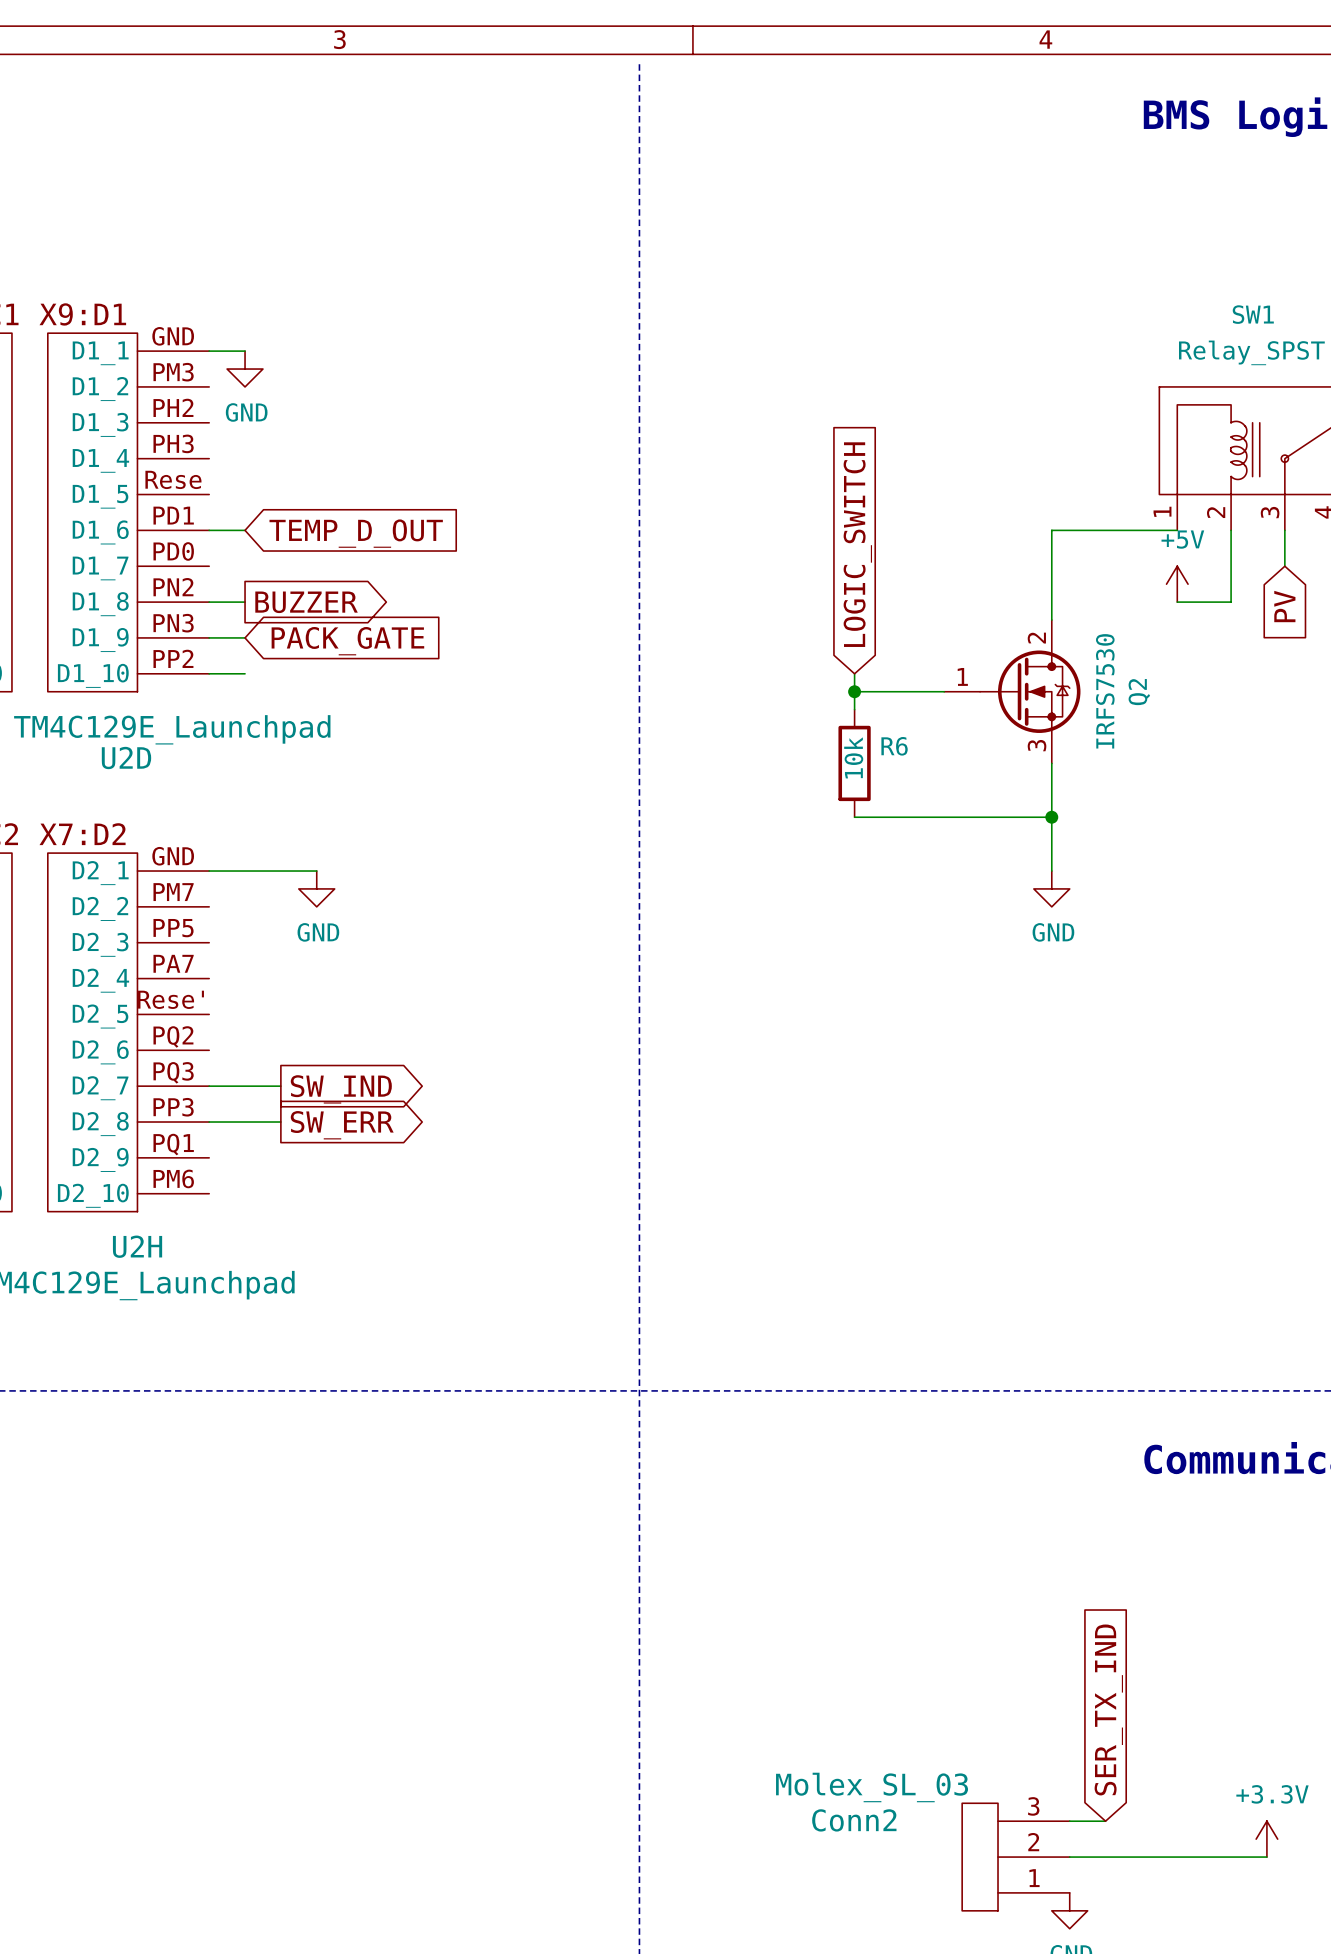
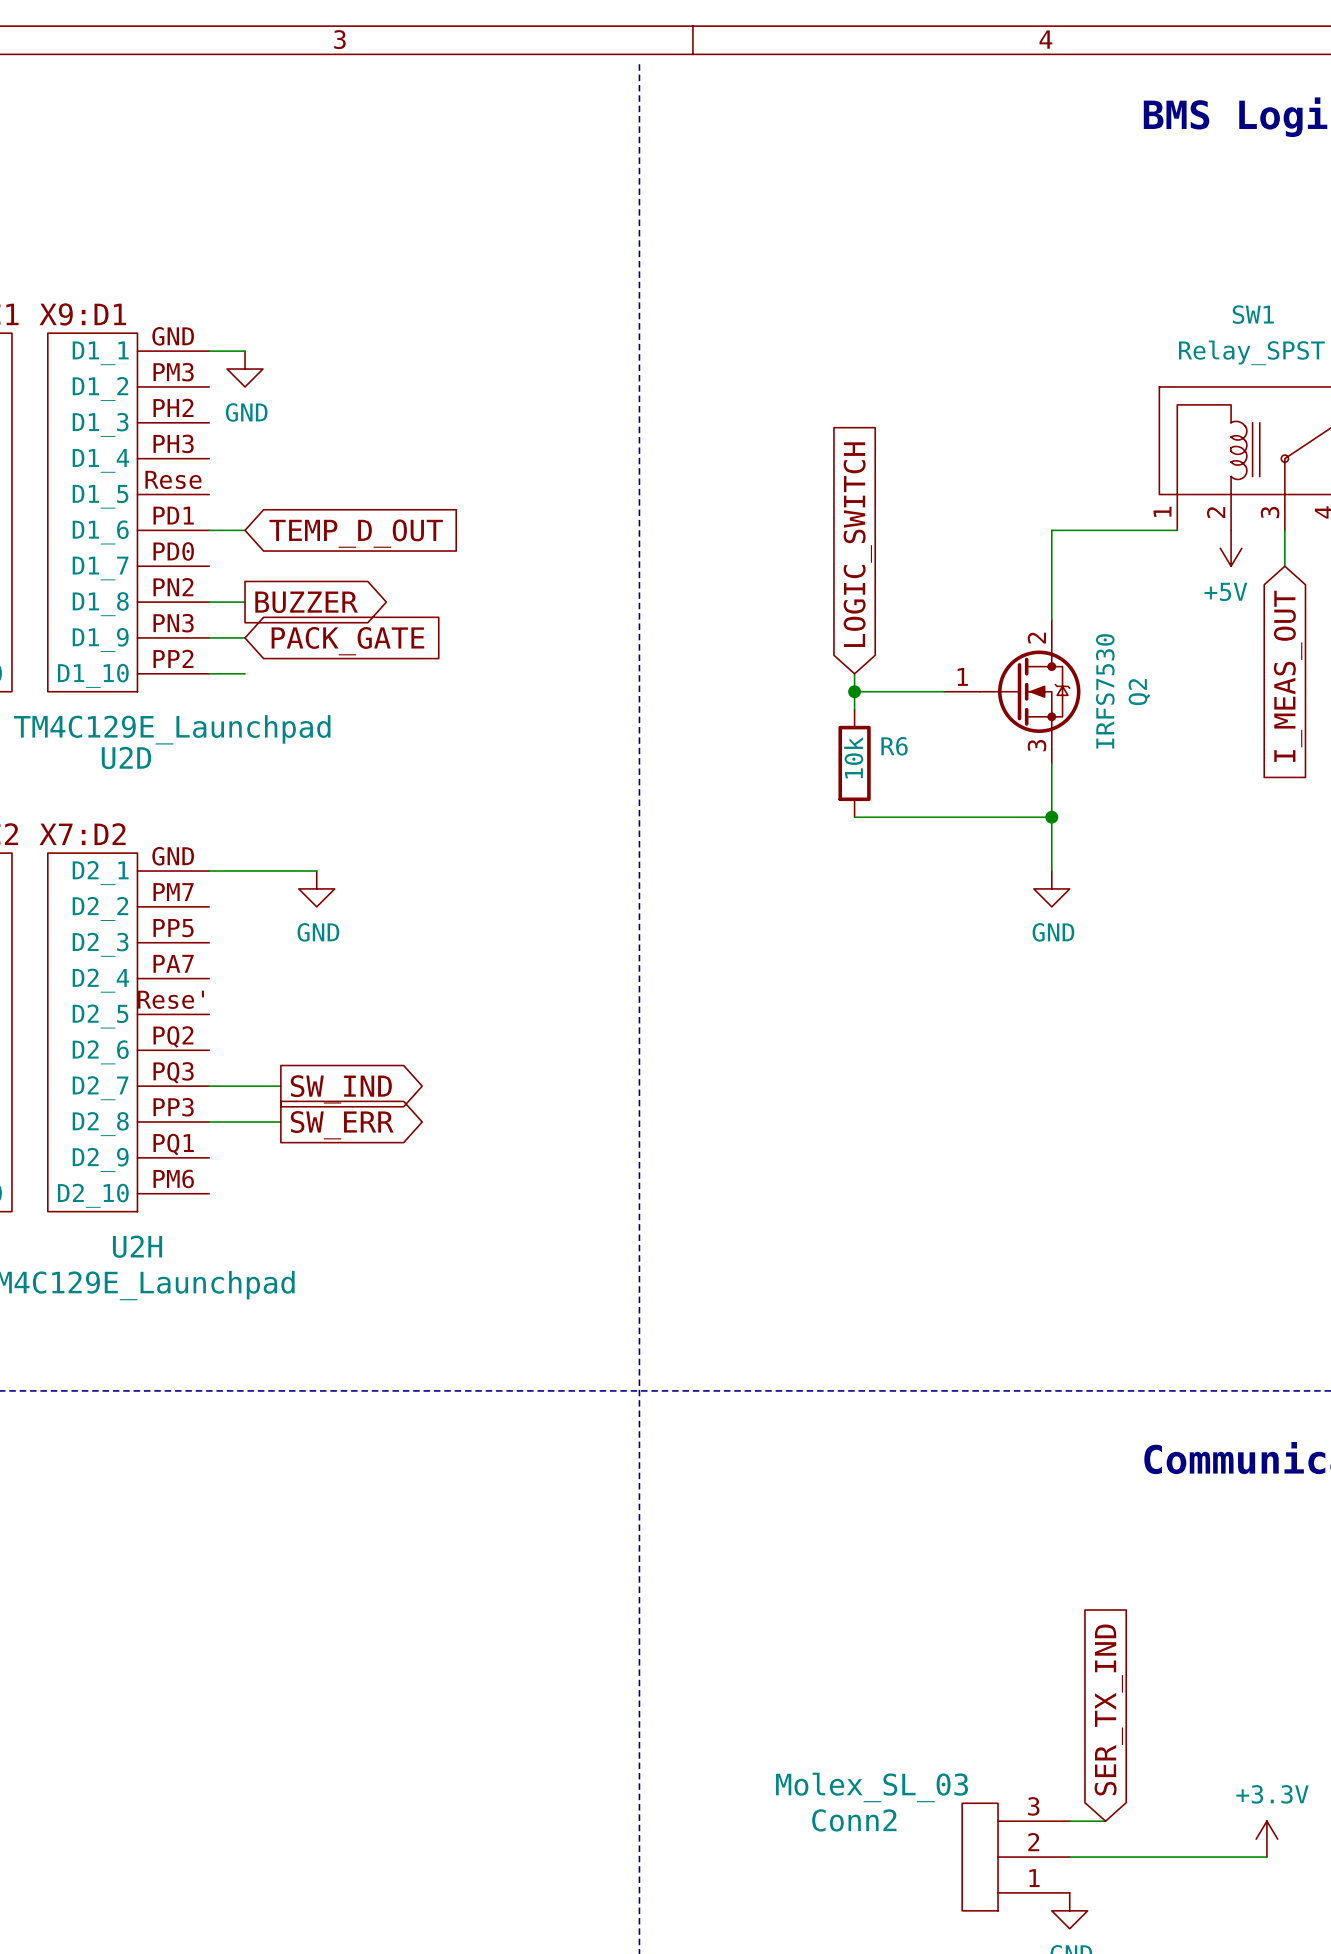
wire: (1231, 530) (1231, 602) (1177, 602) -> none
power symbol rotation: 0° (1177, 584) -> 180° (1231, 548)
power symbol position: +5V (1177, 584) -> +5V (1231, 548)
global label: PV (1284, 606) -> I_MEAS_OUT (1288, 676)

